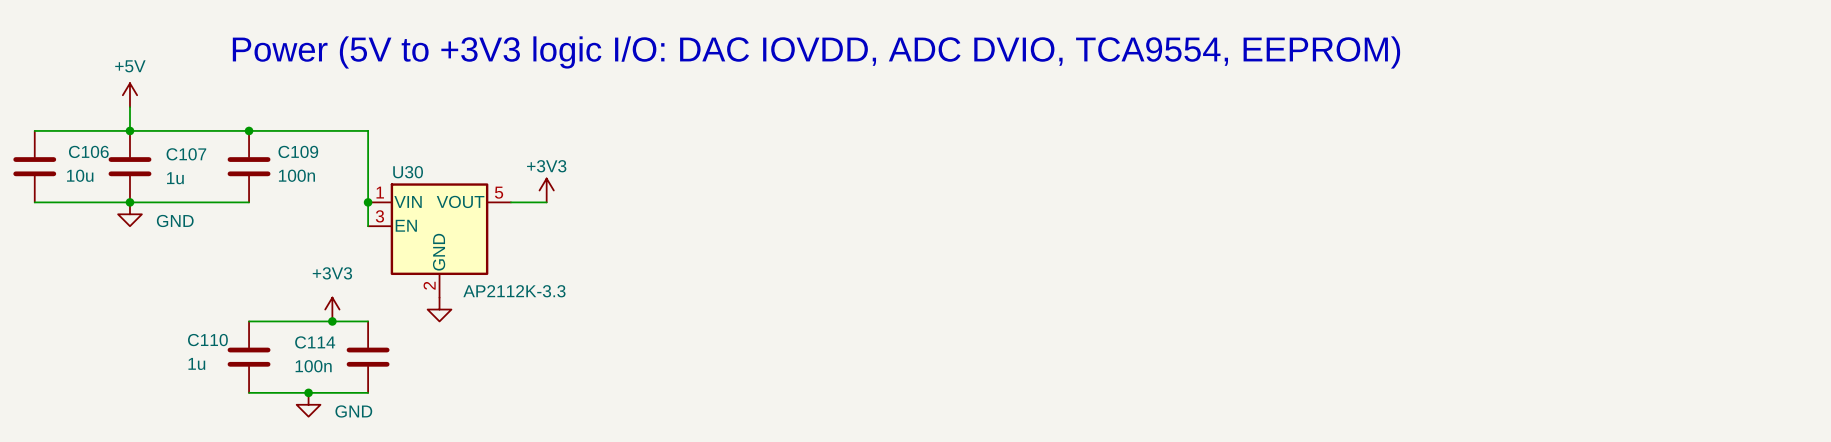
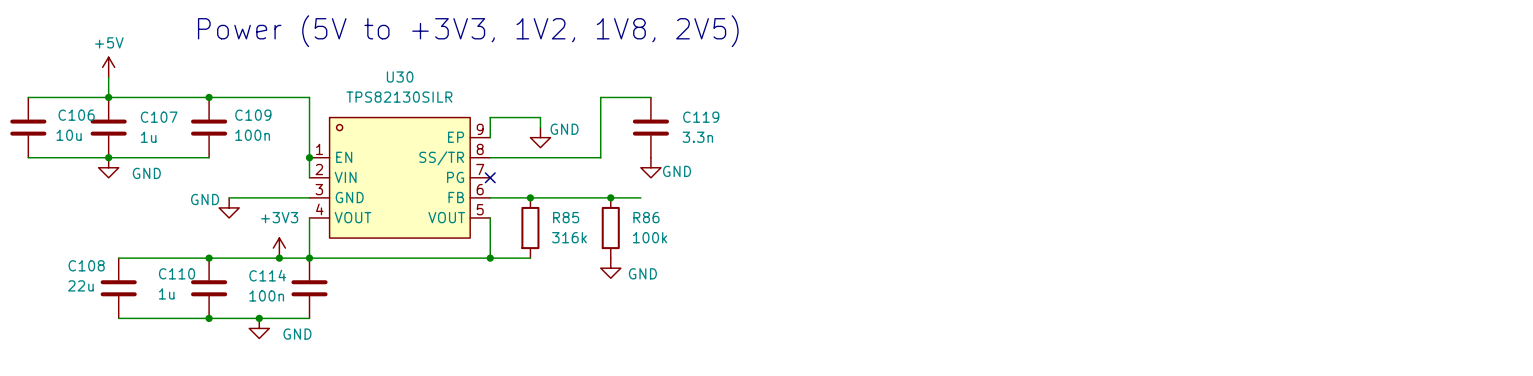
text: Power (5V to +3V3 logic I/O: DAC IOVDD, ADC DVIO, TCA9554, EEPROM) (816, 52) -> Power (5V to +3V3, 1V2, 1V8, 2V5) (468, 31)
wire: none -> (650, 97) (600, 97) (600, 157) (490, 157)
wire: none -> (540, 127) (540, 117) (490, 117) (490, 137)
C119: none -> 3.3n (650, 127)
U30 name position: U30 (408, 172) -> U30 (400, 77)
power symbol: none -> GND (540, 137)
U30 symbol: [368, 183, 511, 298] -> [309, 117, 491, 239]
power symbol: +3V3 (546, 190) -> none
power symbol: none -> GND (650, 167)
no-connect mark: none -> (490, 177)
wire: none -> (229, 197) (309, 197)
wire: none -> (490, 197) (640, 197)
junction: none -> (530, 197)
junction: none -> (610, 197)
power symbol: none -> GND (229, 207)
wire: none -> (309, 217) (309, 258) (530, 258)
wire: none -> (490, 217) (490, 258)
R85: none -> 316k (530, 228)
R86: none -> 100k (610, 228)
U30 value: AP2112K-3.3 (514, 291) -> TPS82130SILR (399, 97)
power symbol: (439, 309) -> none
wire: none -> (118, 258) (209, 258)
junction: none -> (209, 258)
junction: none -> (309, 258)
junction: none -> (490, 258)
power symbol: none -> GND (610, 268)
C108: none -> 22u (118, 288)
wire: none -> (118, 318) (209, 318)
junction: none -> (209, 318)

